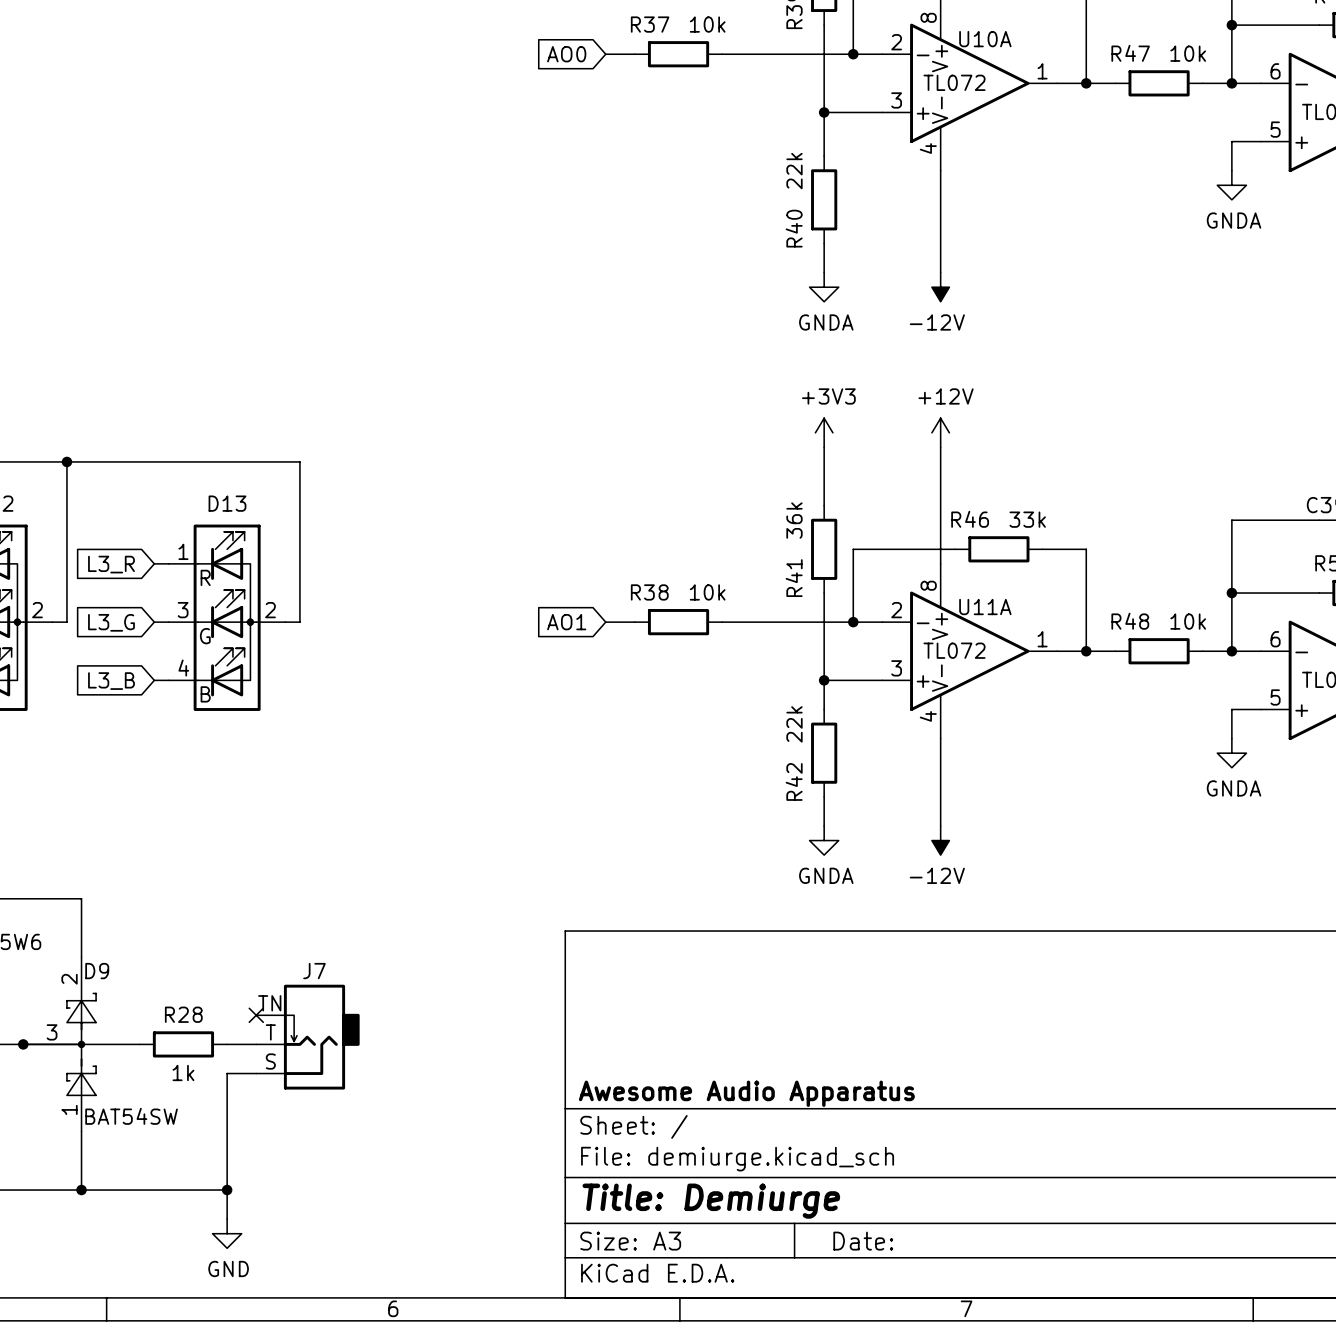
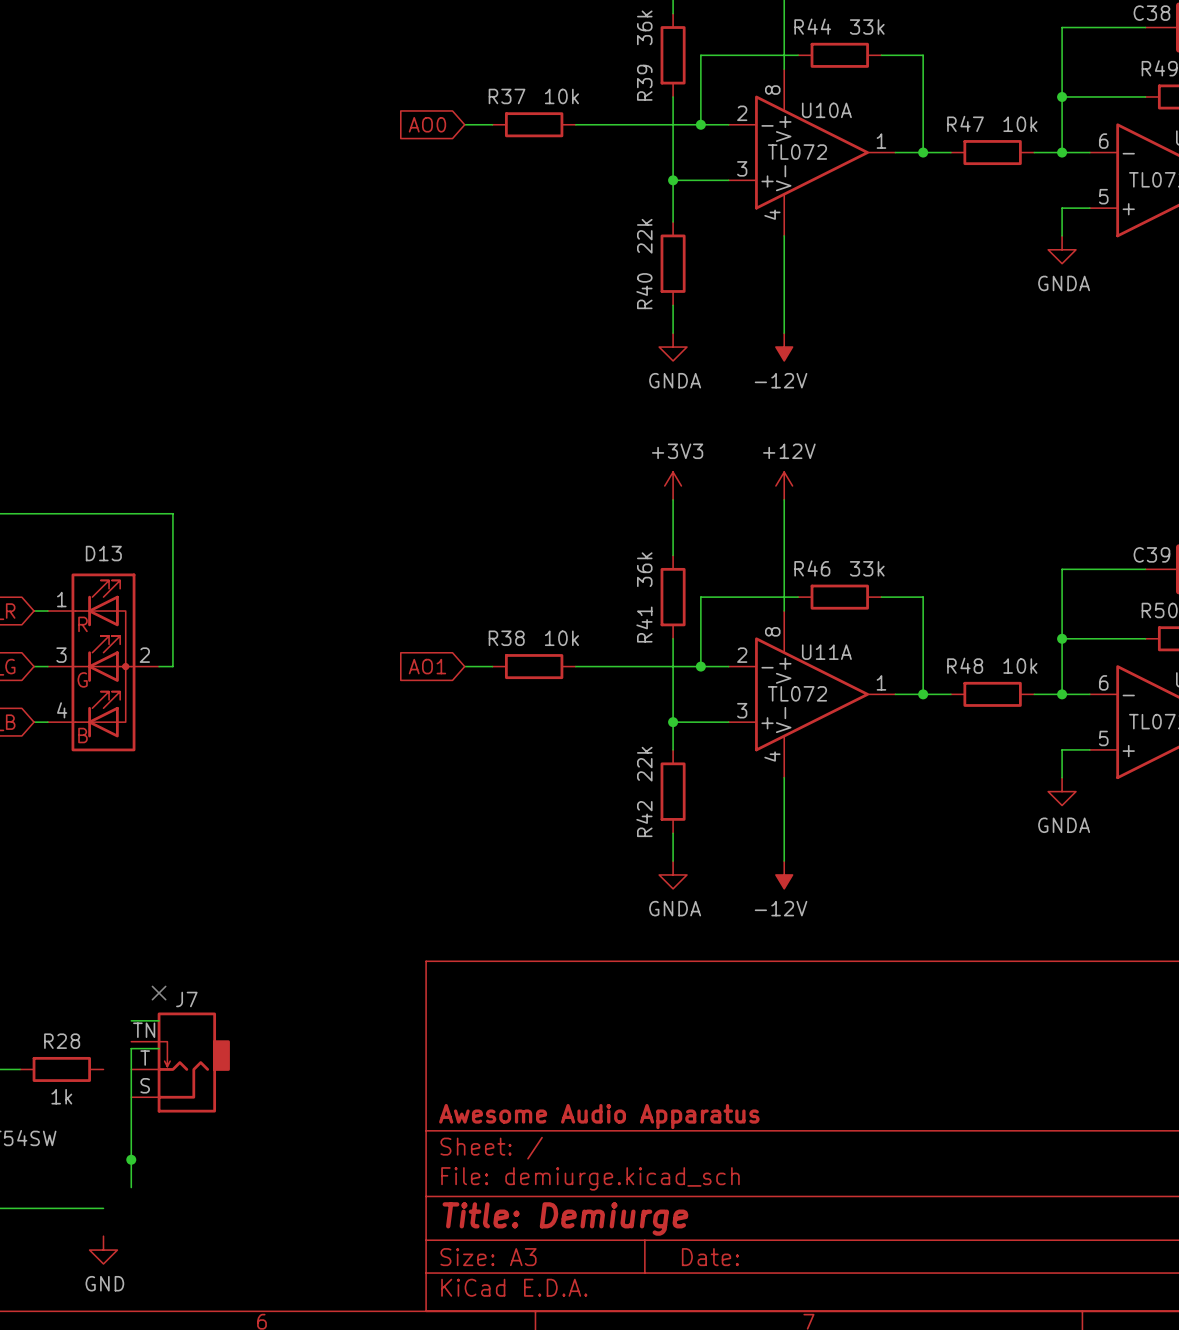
no-connect mark position: (256, 1015) -> (159, 993)
wire: (227, 1044) (256, 1044) -> (131, 1020) (159, 1020)
wire: (256, 1073) (227, 1073) (227, 1219) -> (159, 1048) (131, 1048) (131, 1187)
junction position: (227, 1190) -> (131, 1159)

